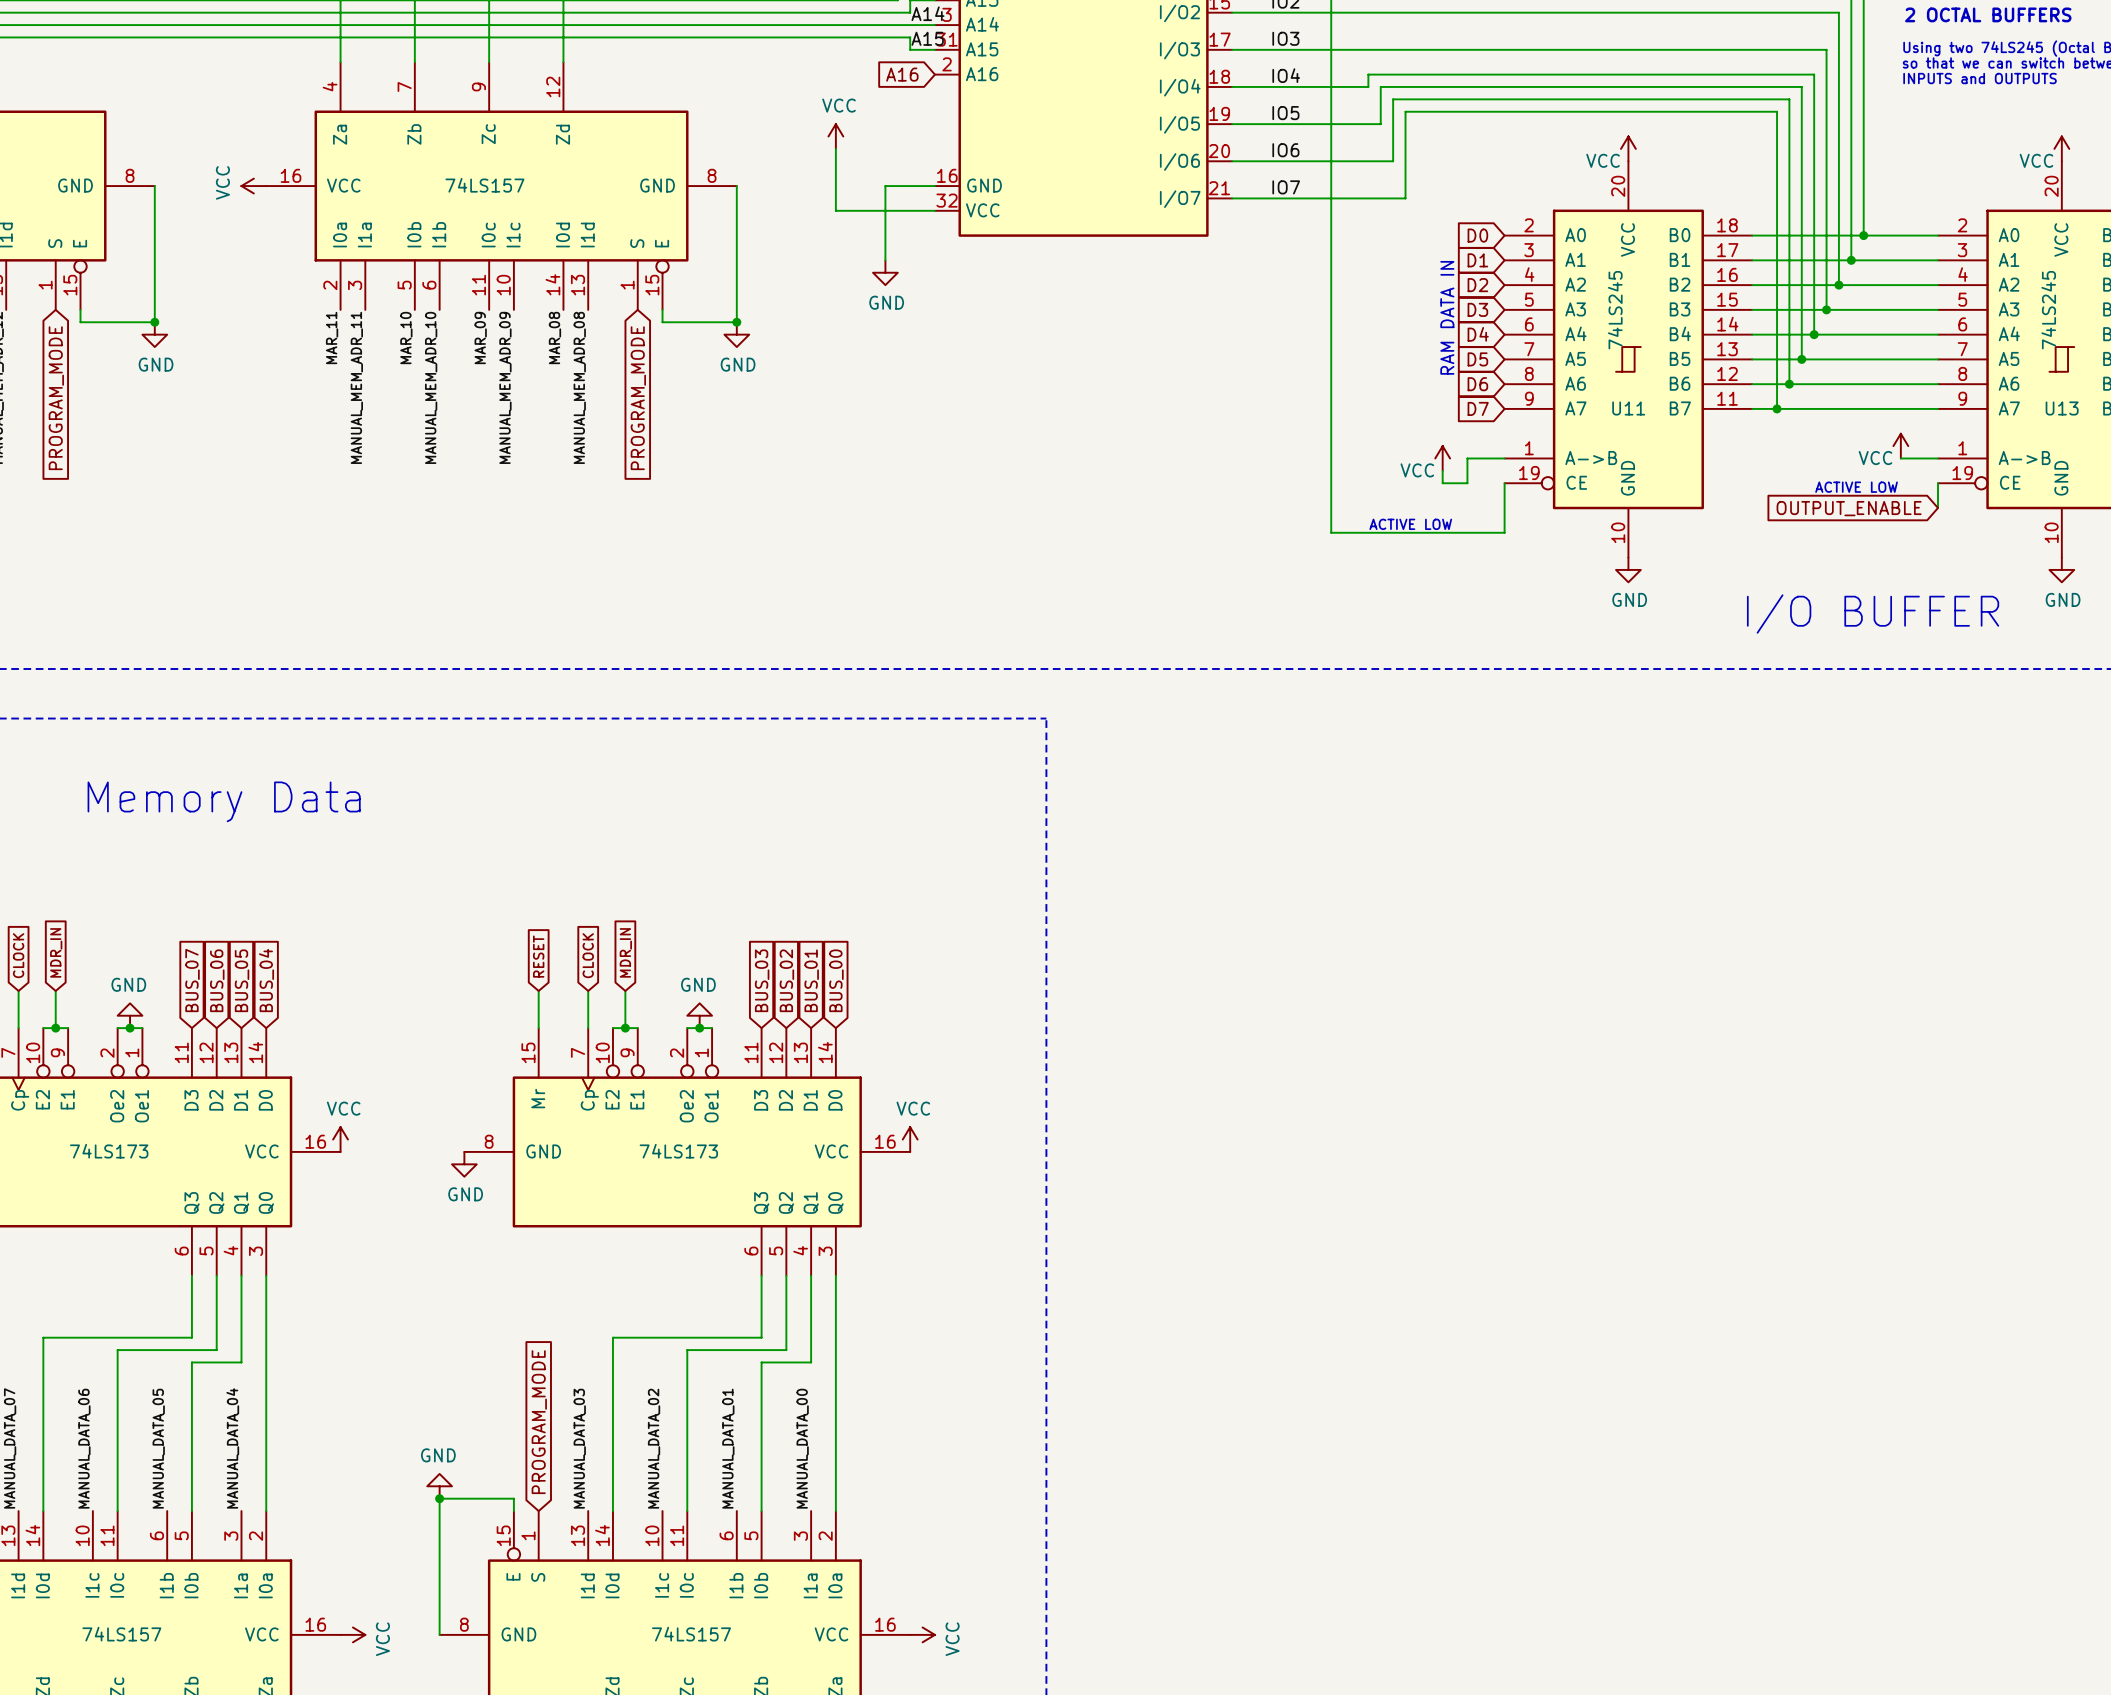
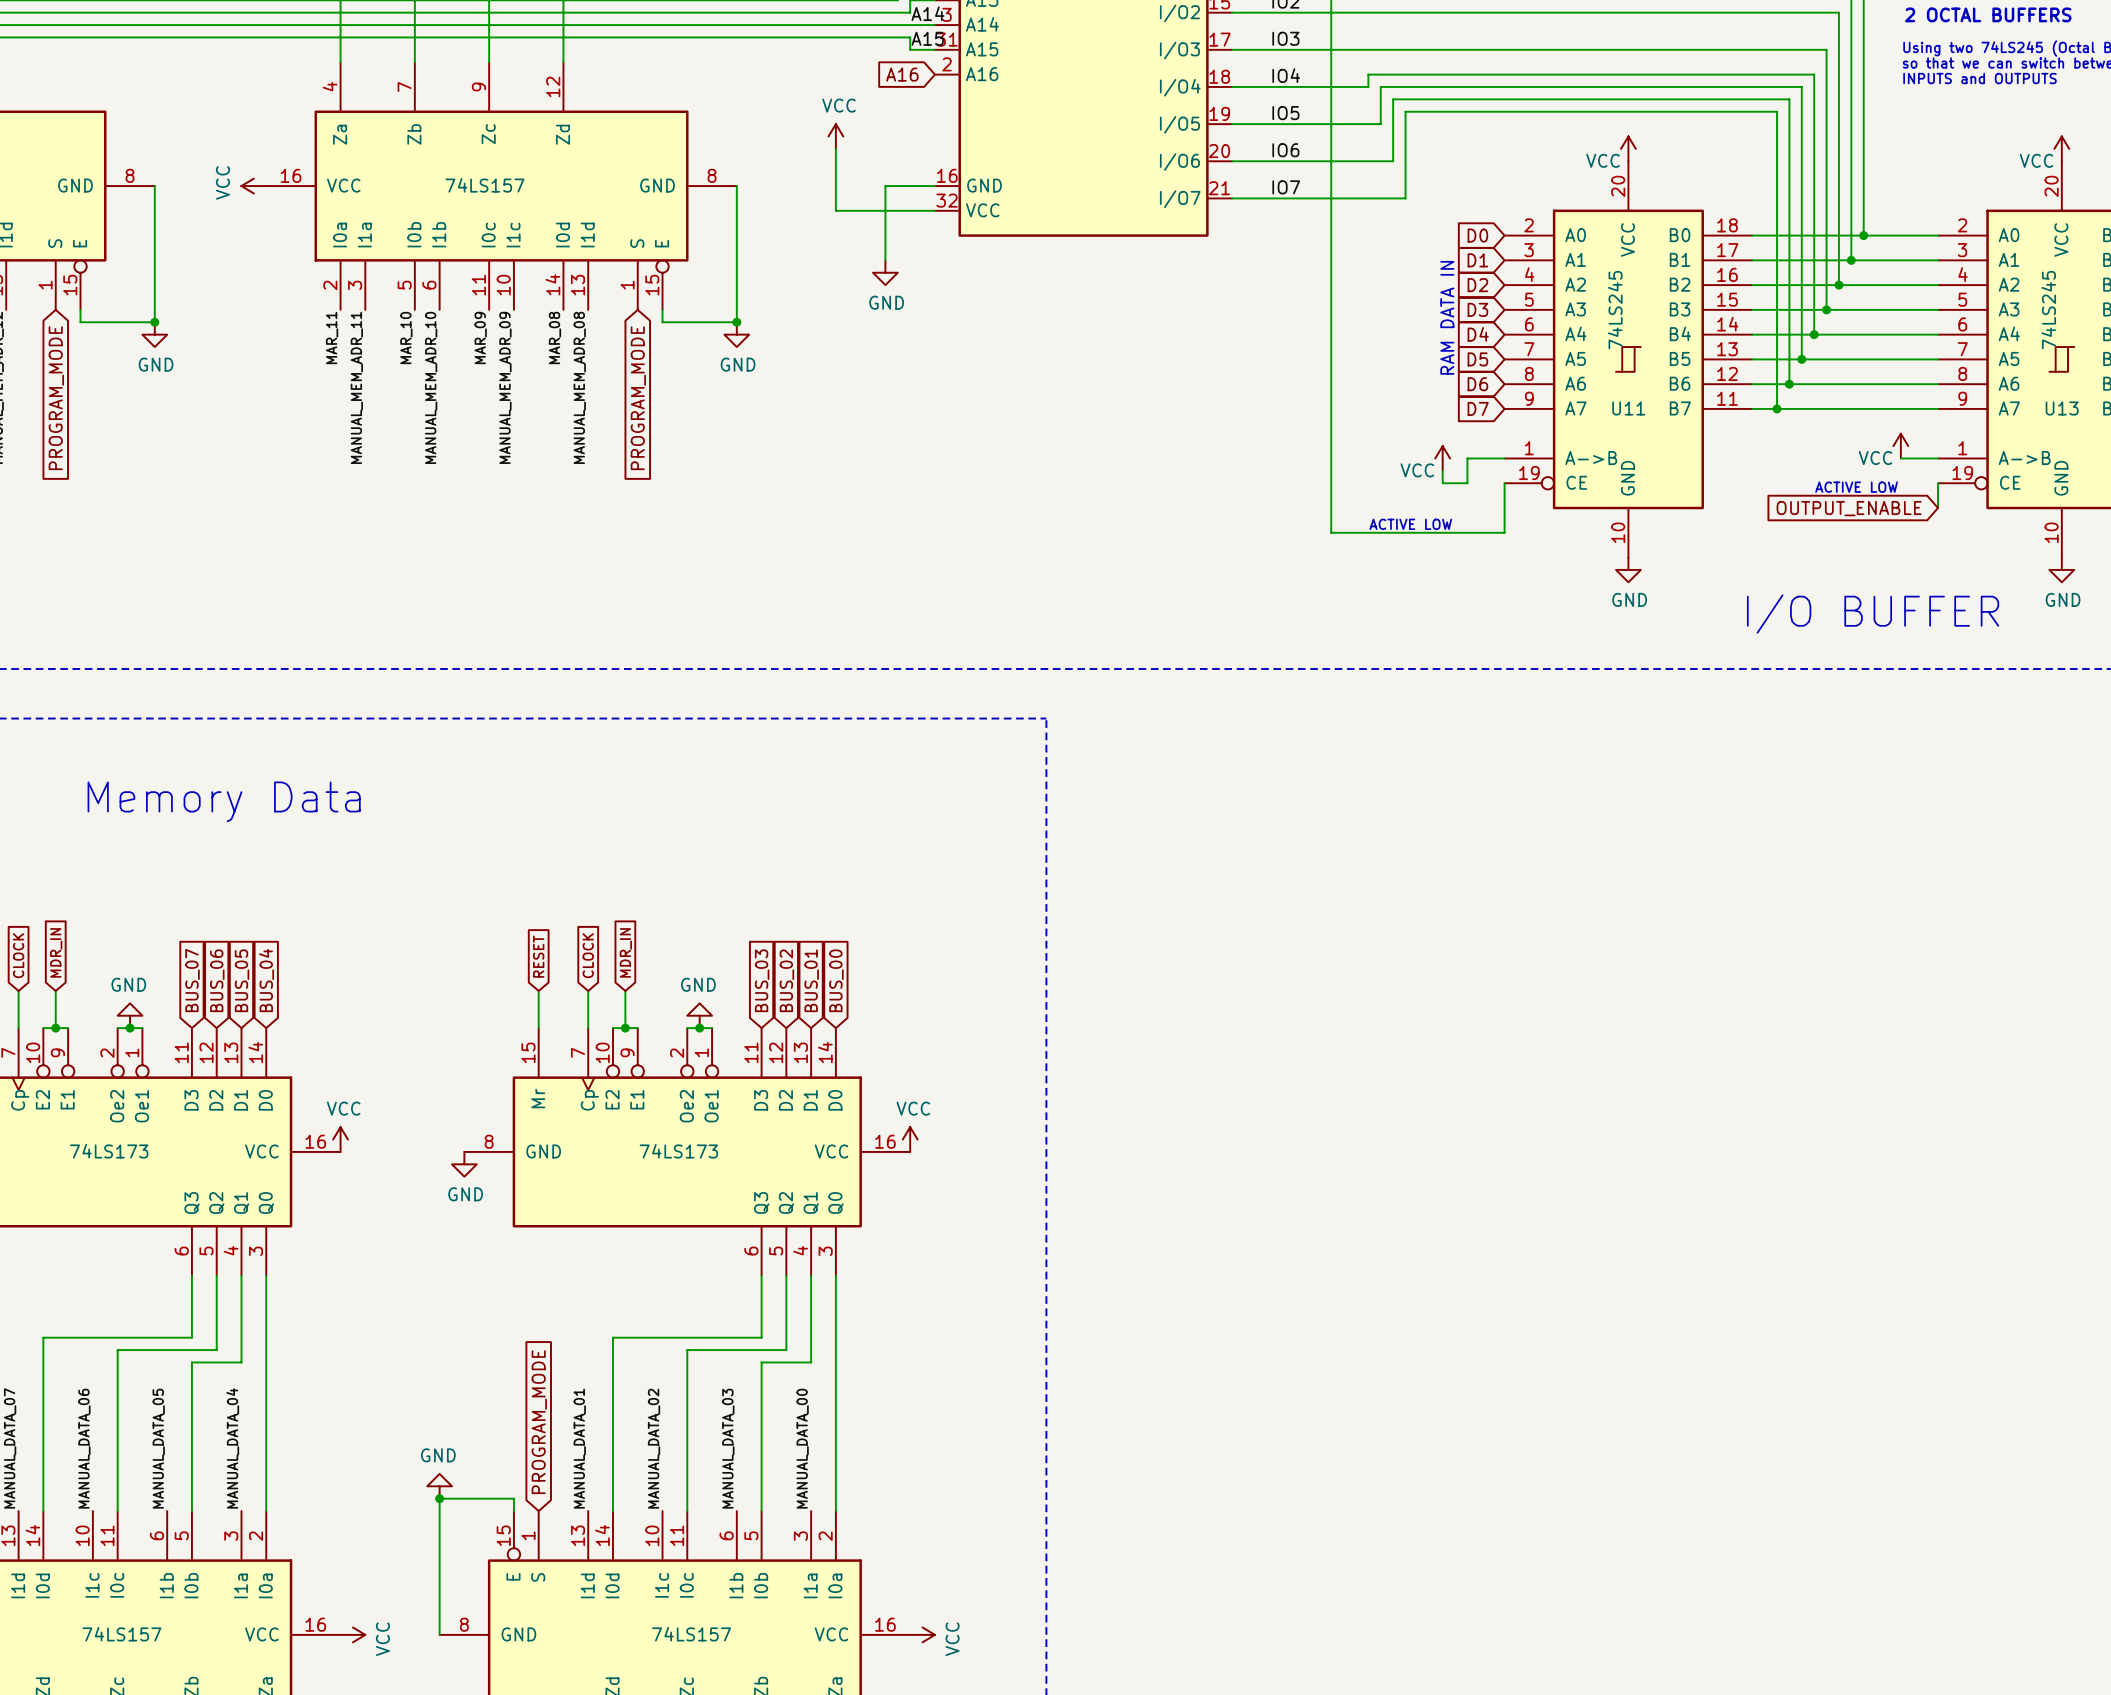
label: MANUAL_DATA_03 (579, 1448) -> MANUAL_DATA_01 (579, 1448)
label: MANUAL_DATA_01 (728, 1448) -> MANUAL_DATA_03 (728, 1448)

